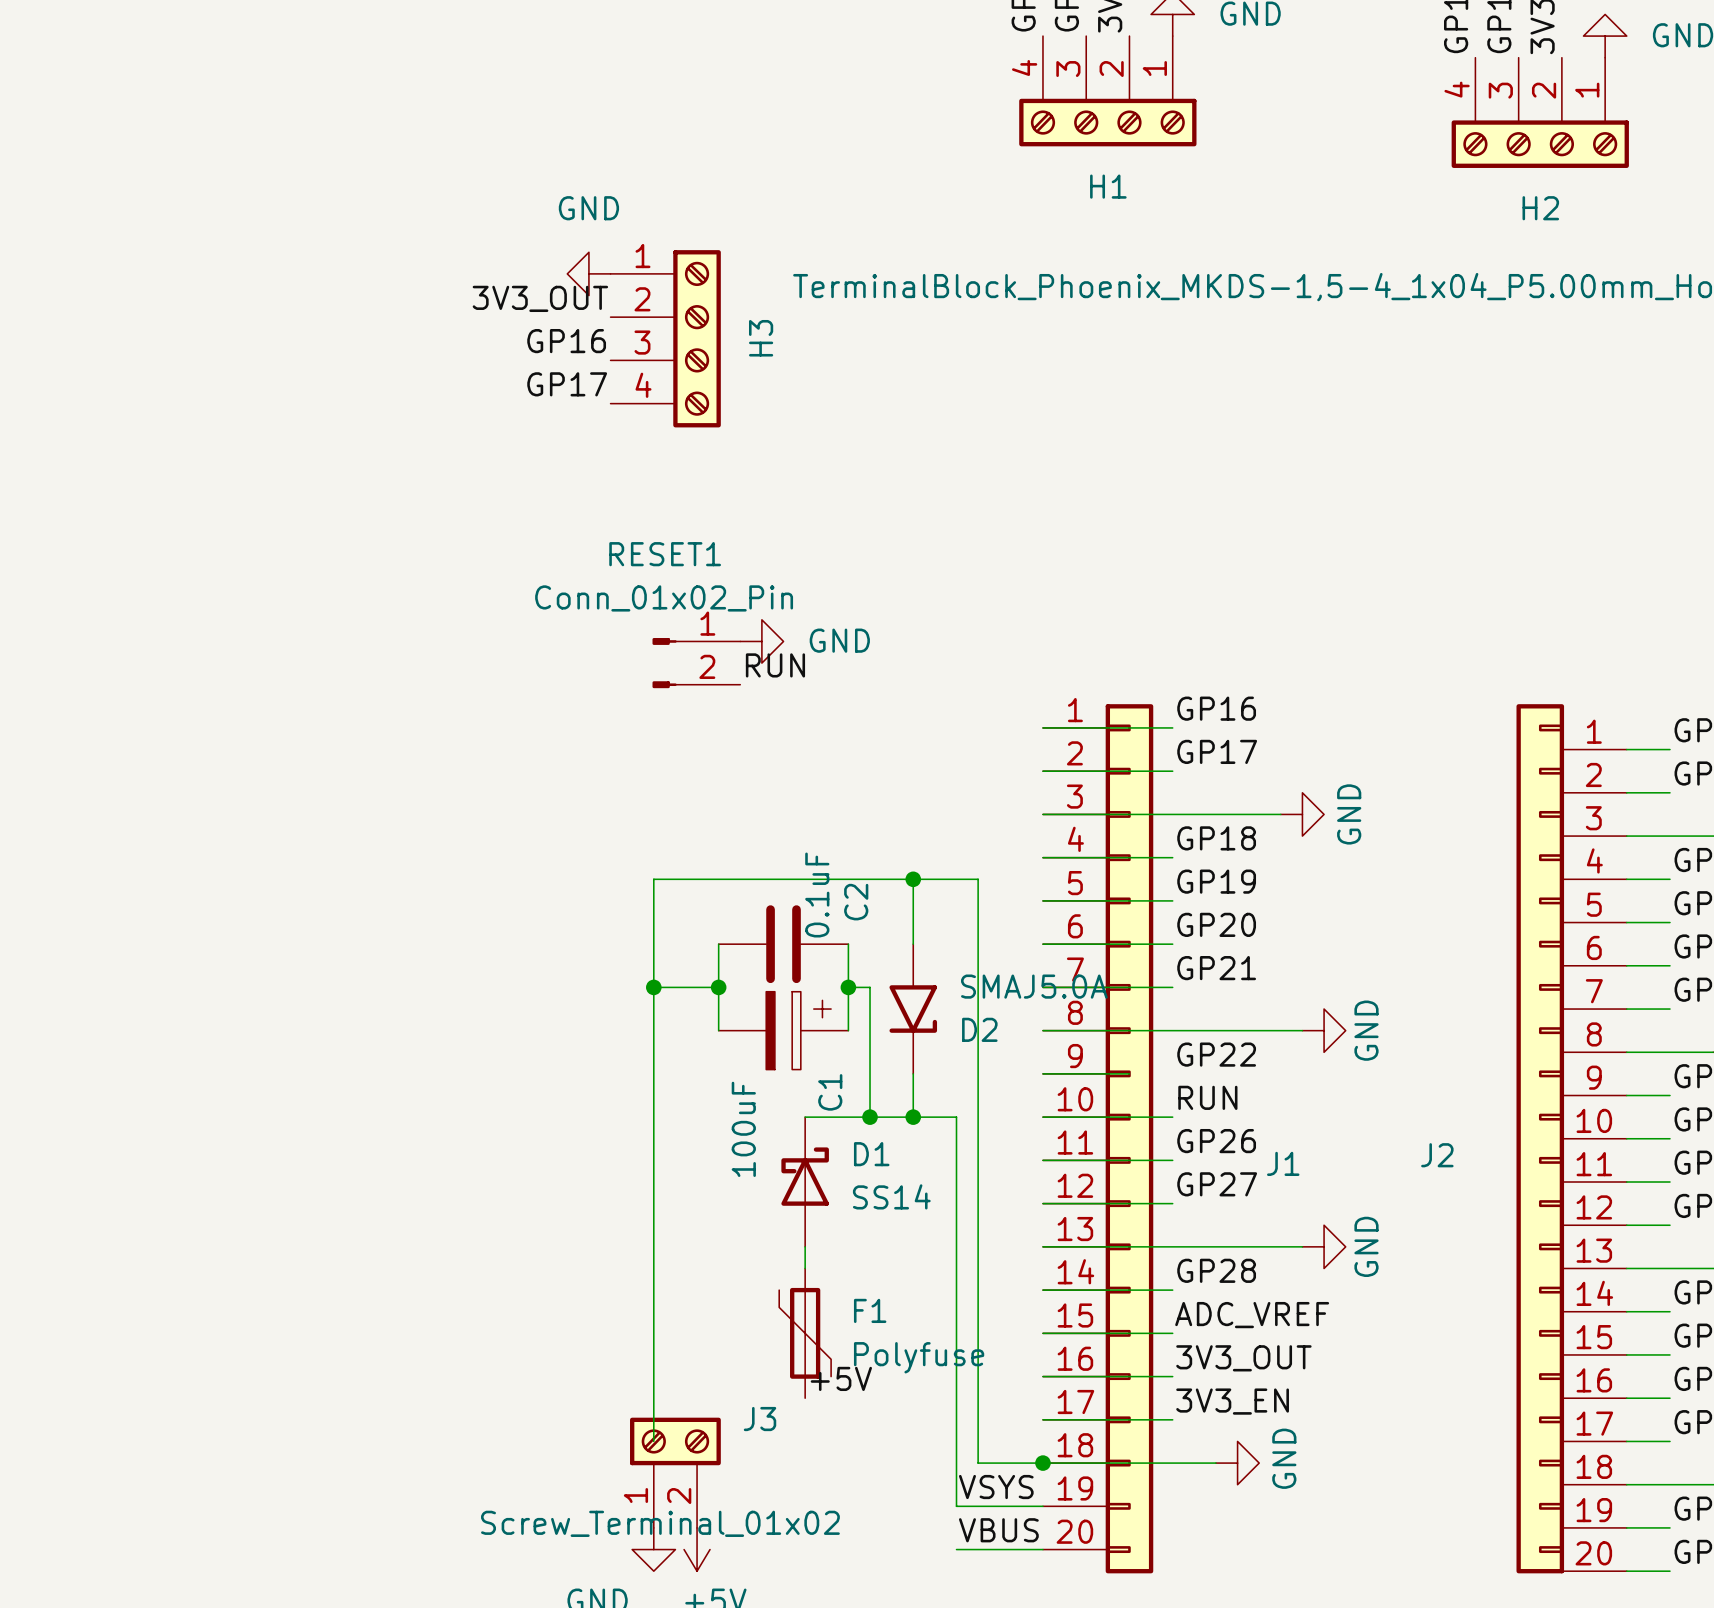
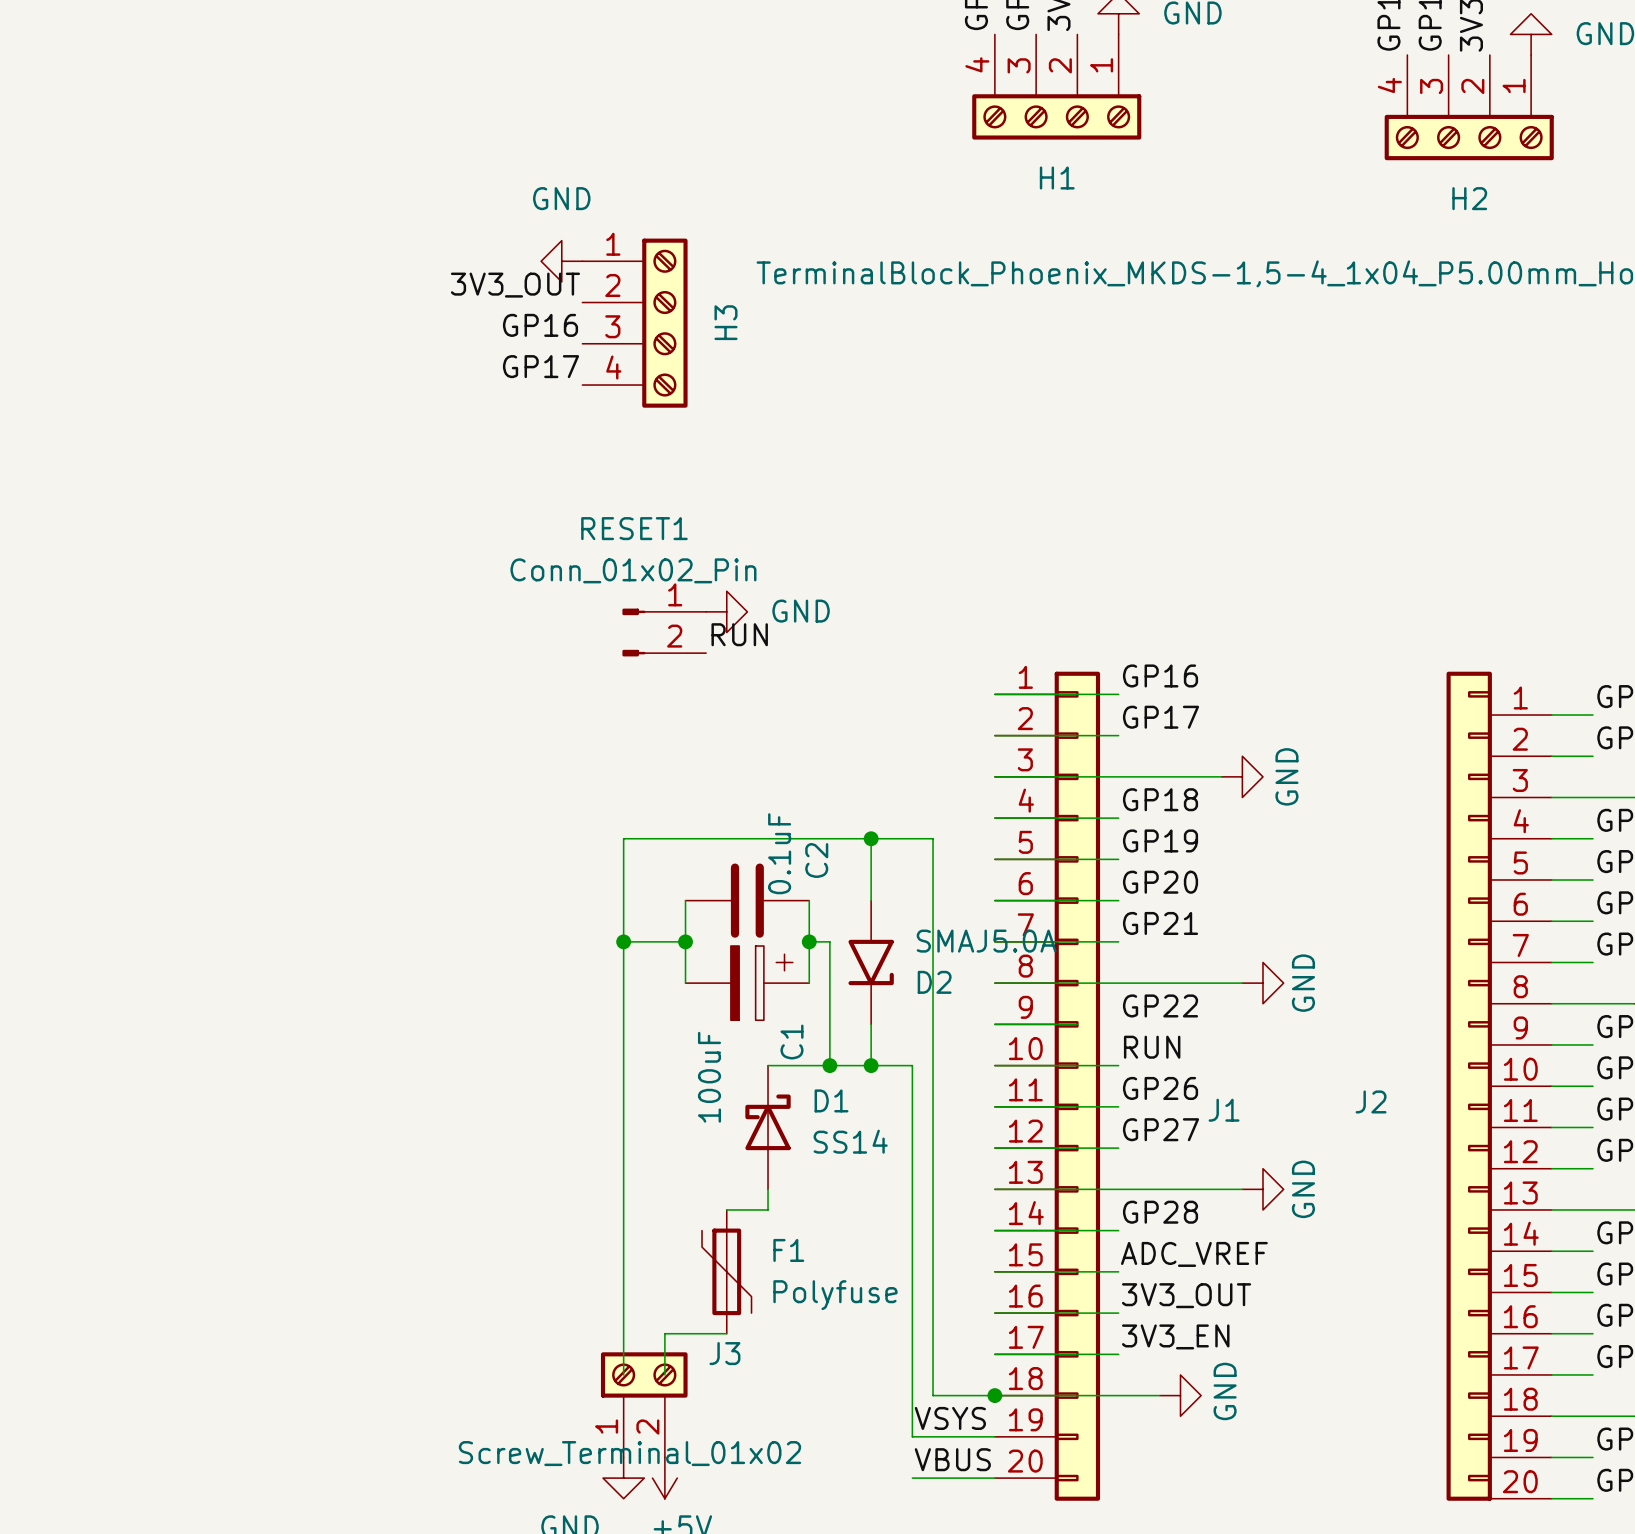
wire: none -> (726, 1209) (768, 1209)
F1 position: (805, 1333) -> (726, 1271)
label: +5V (841, 1378) -> none
wire: none -> (726, 1333) (664, 1333) (664, 1374)

